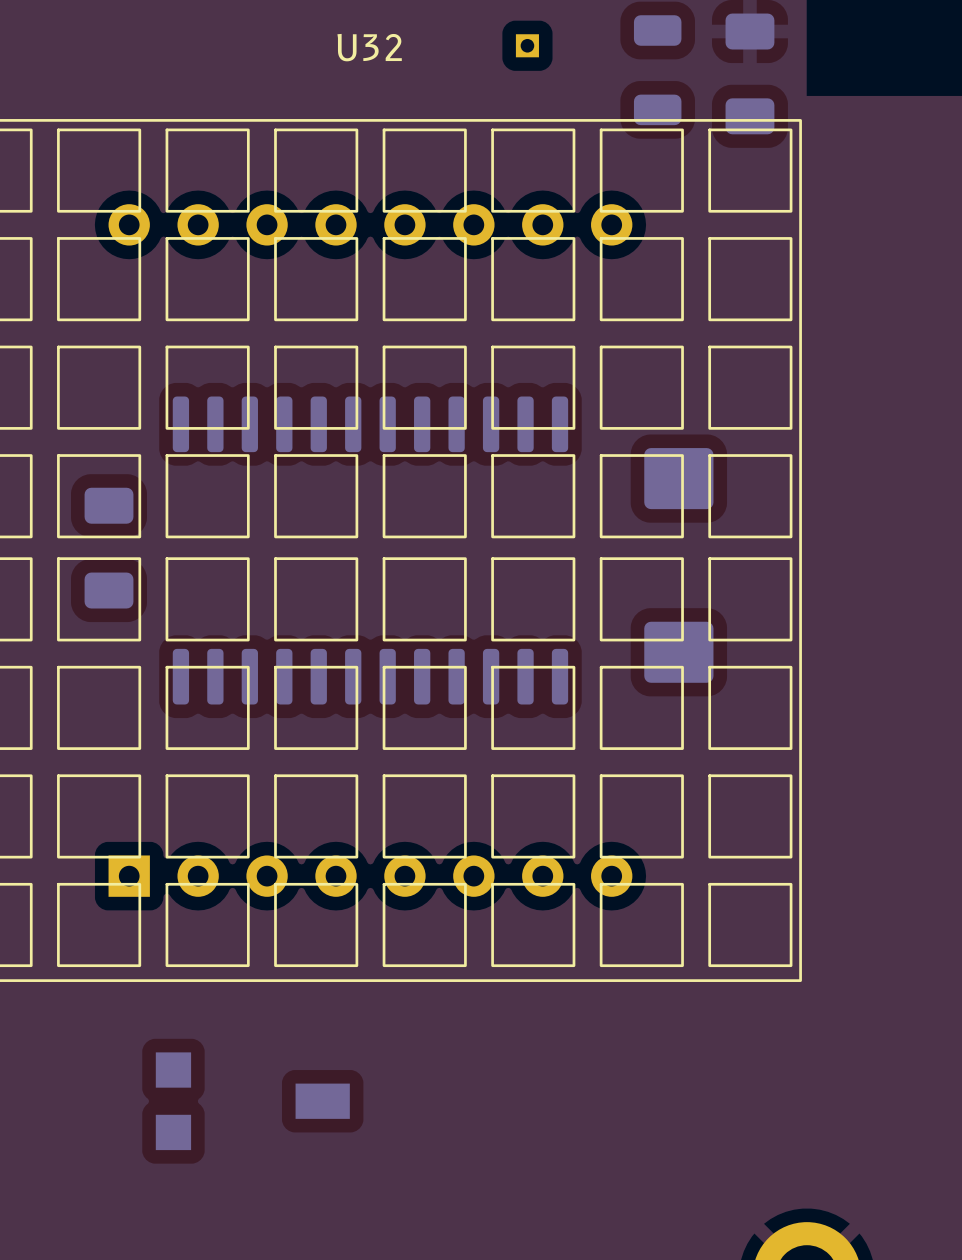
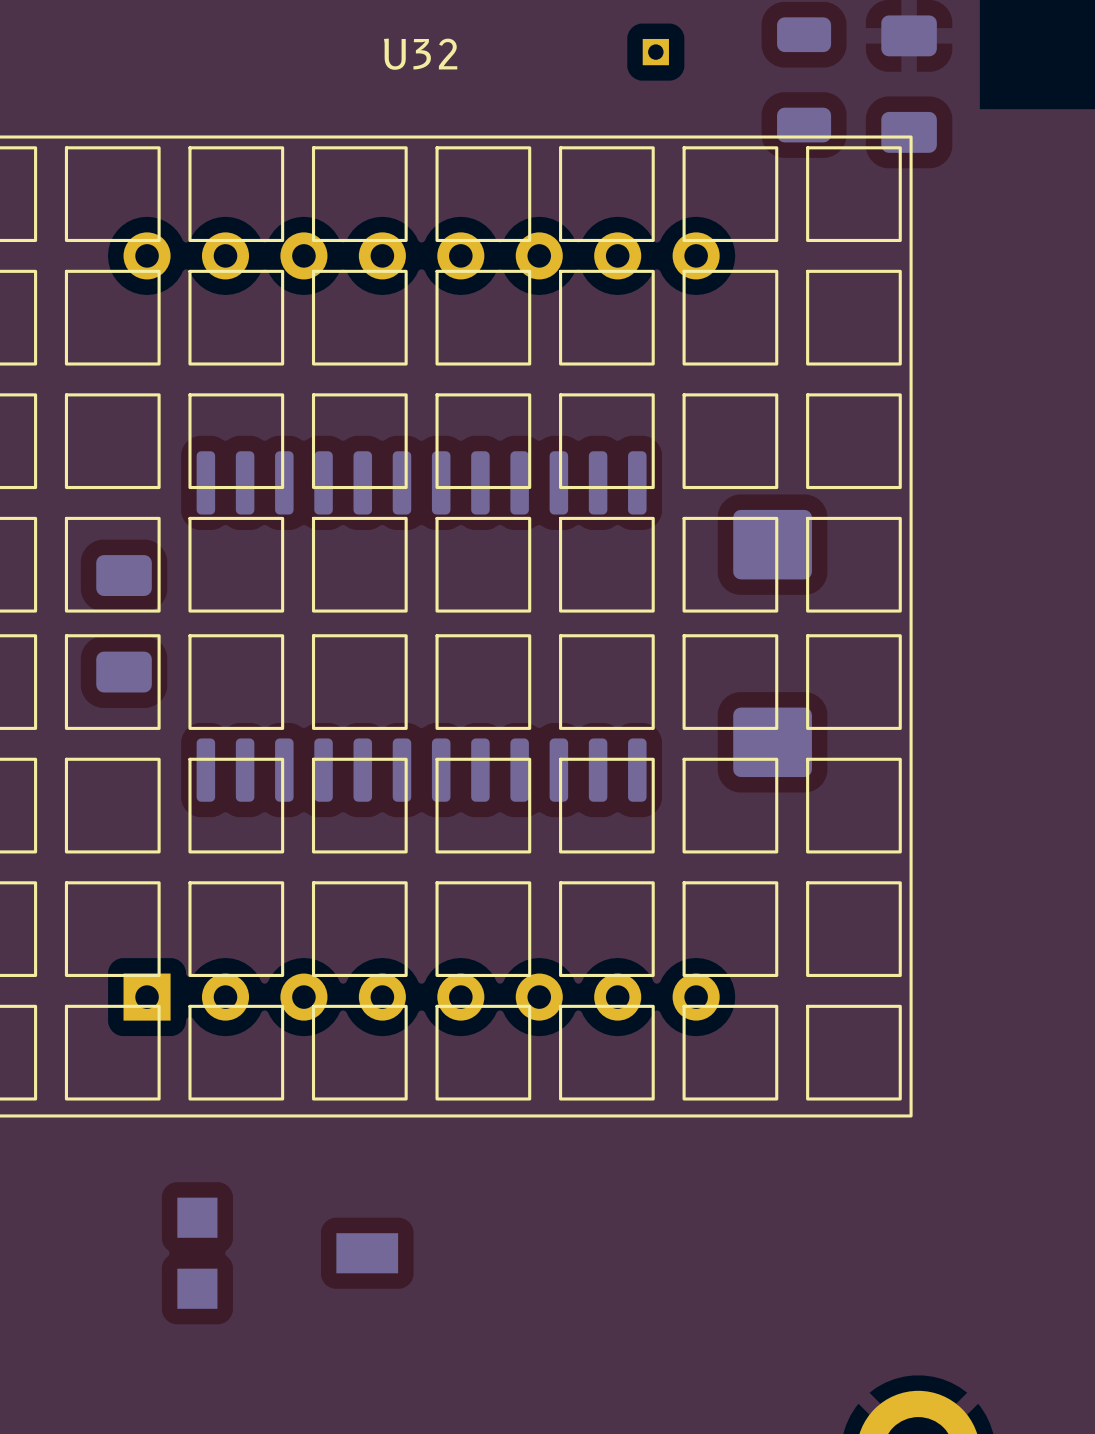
part position: (527, 45) -> (655, 52)
part position: (657, 70) -> (804, 79)
part position: (749, 73) -> (909, 84)

